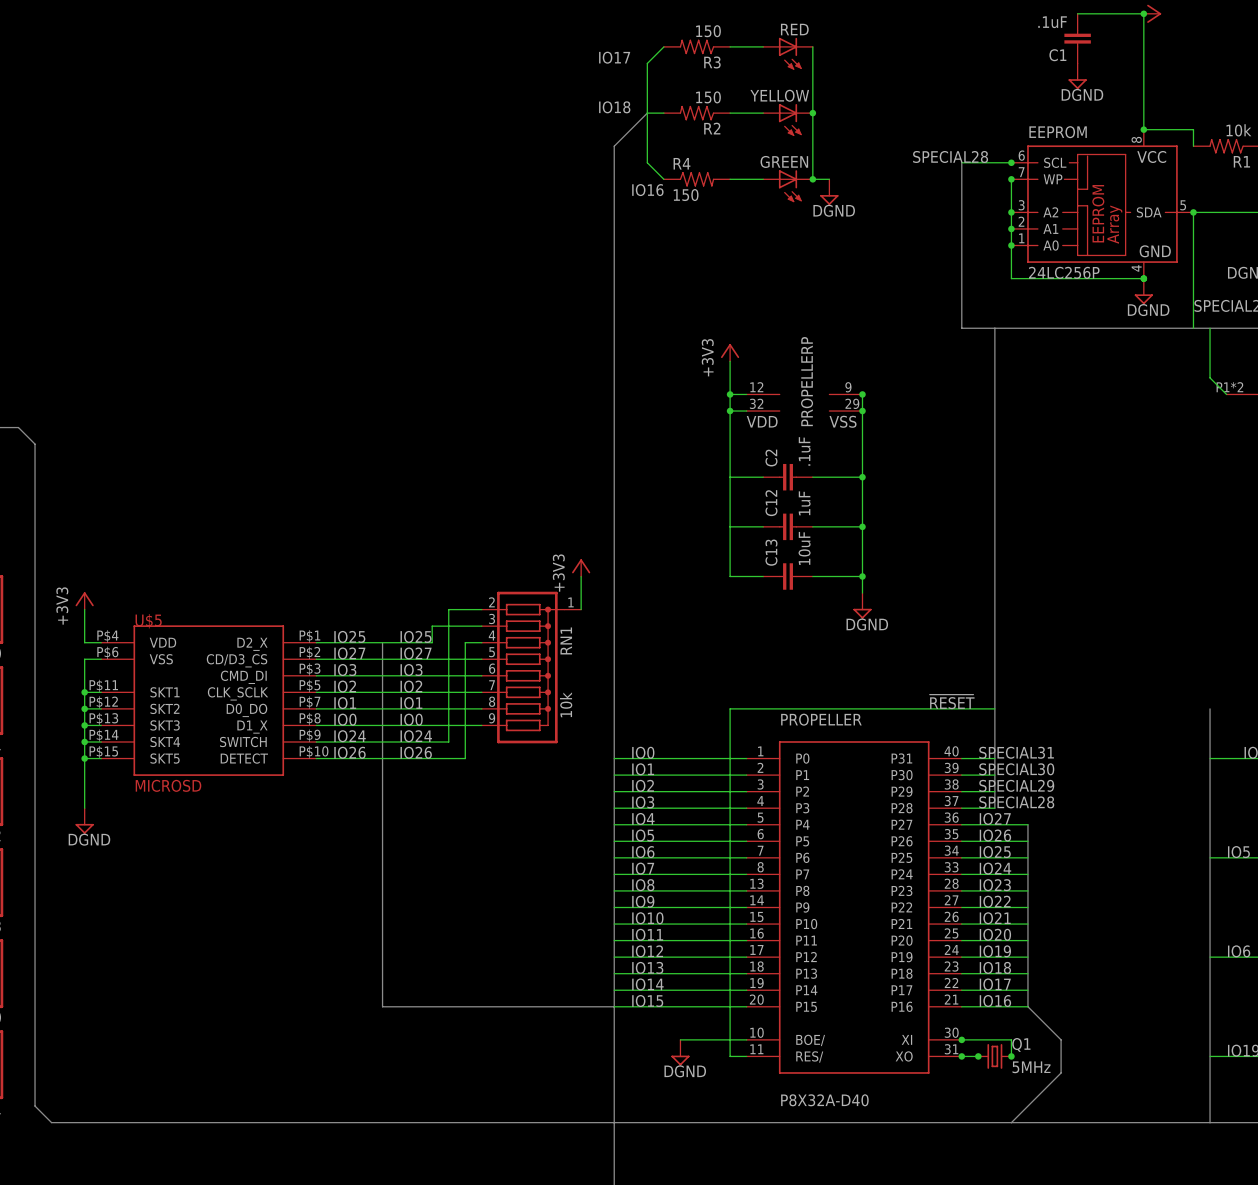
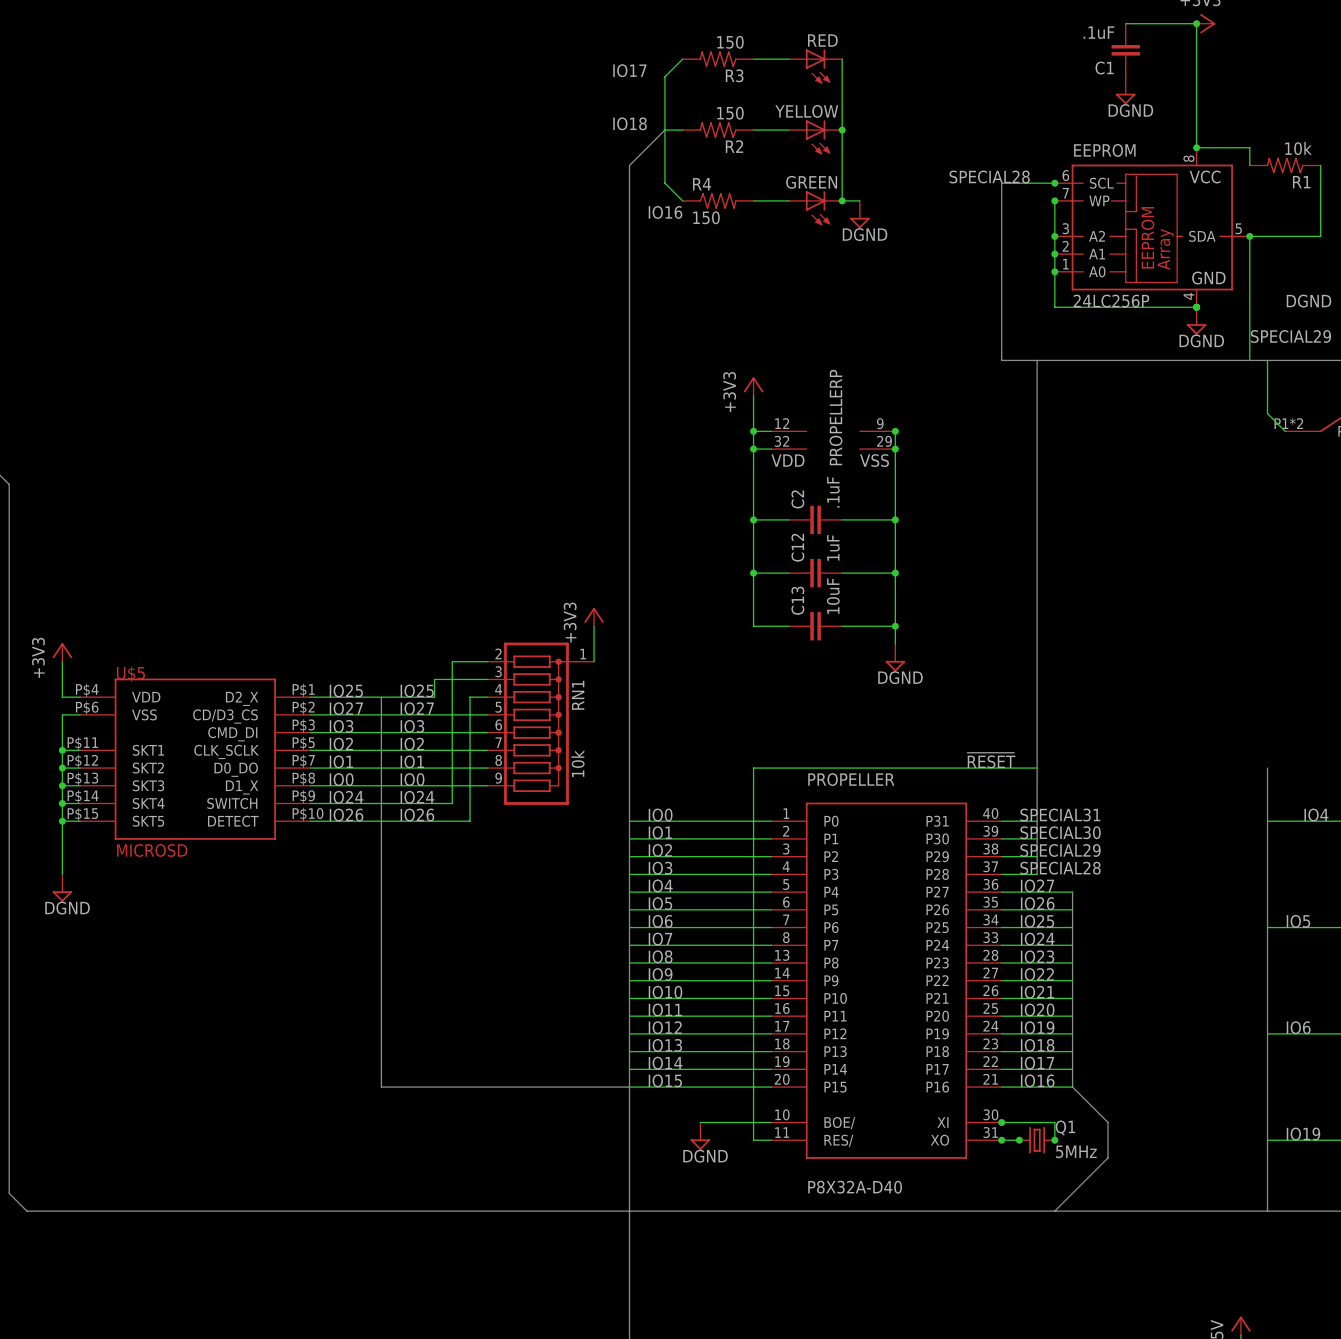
junction: none -> (753, 519)
junction: none -> (753, 573)

